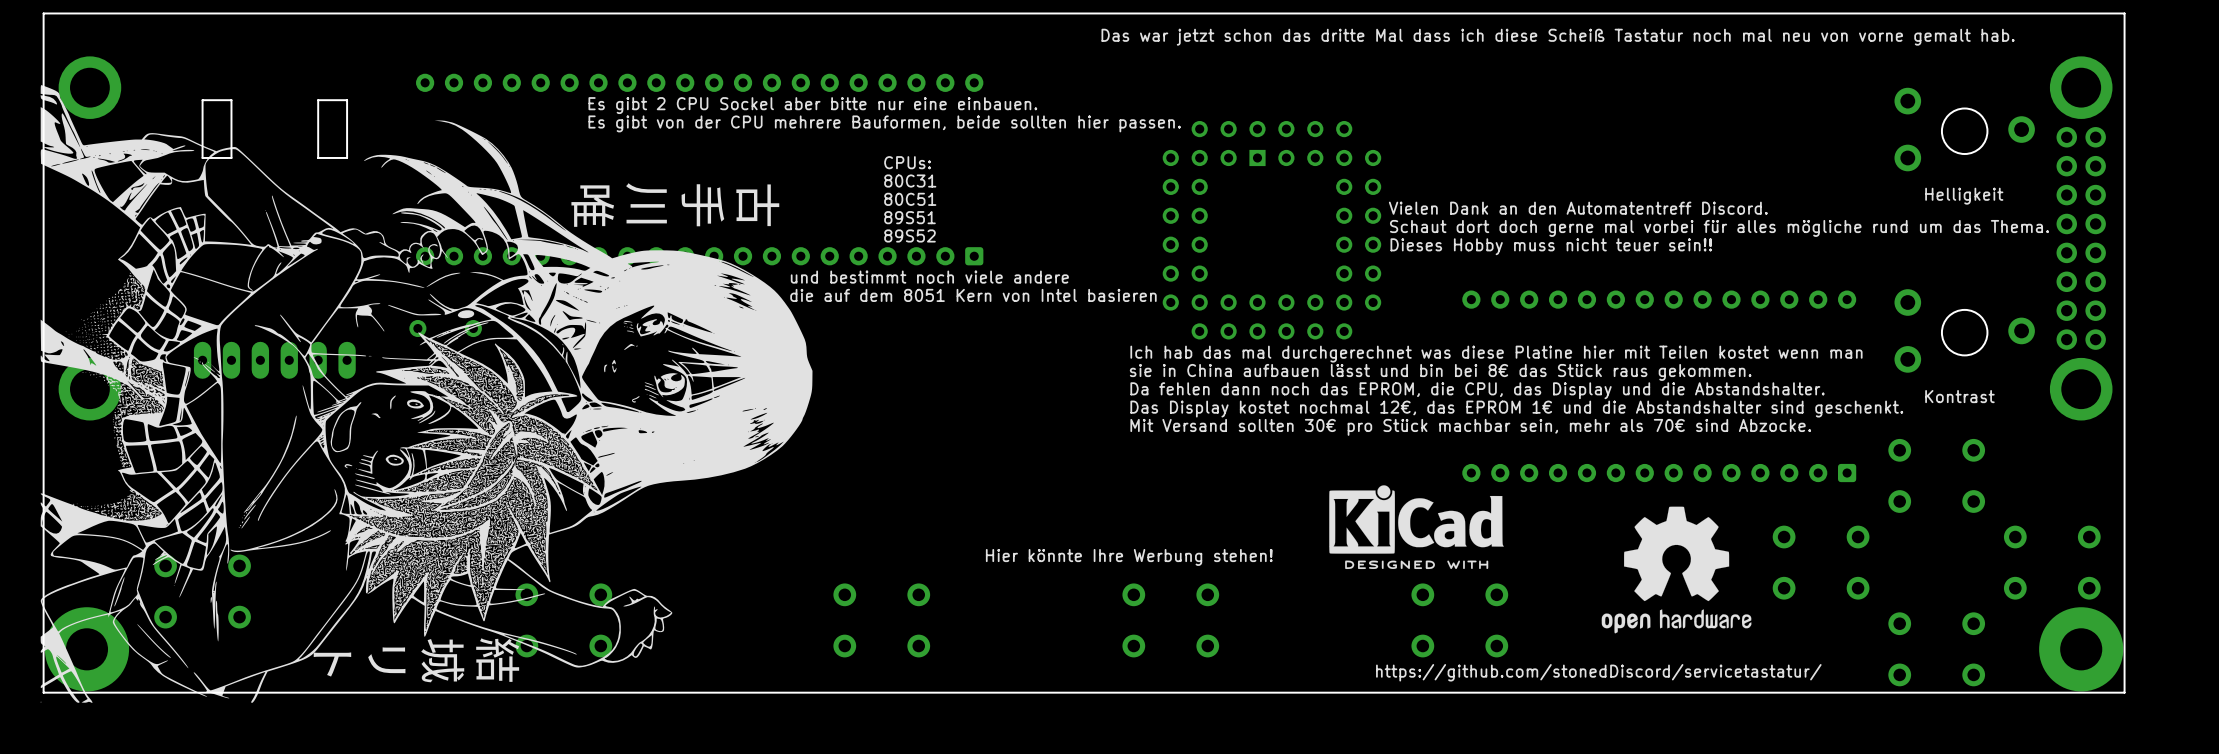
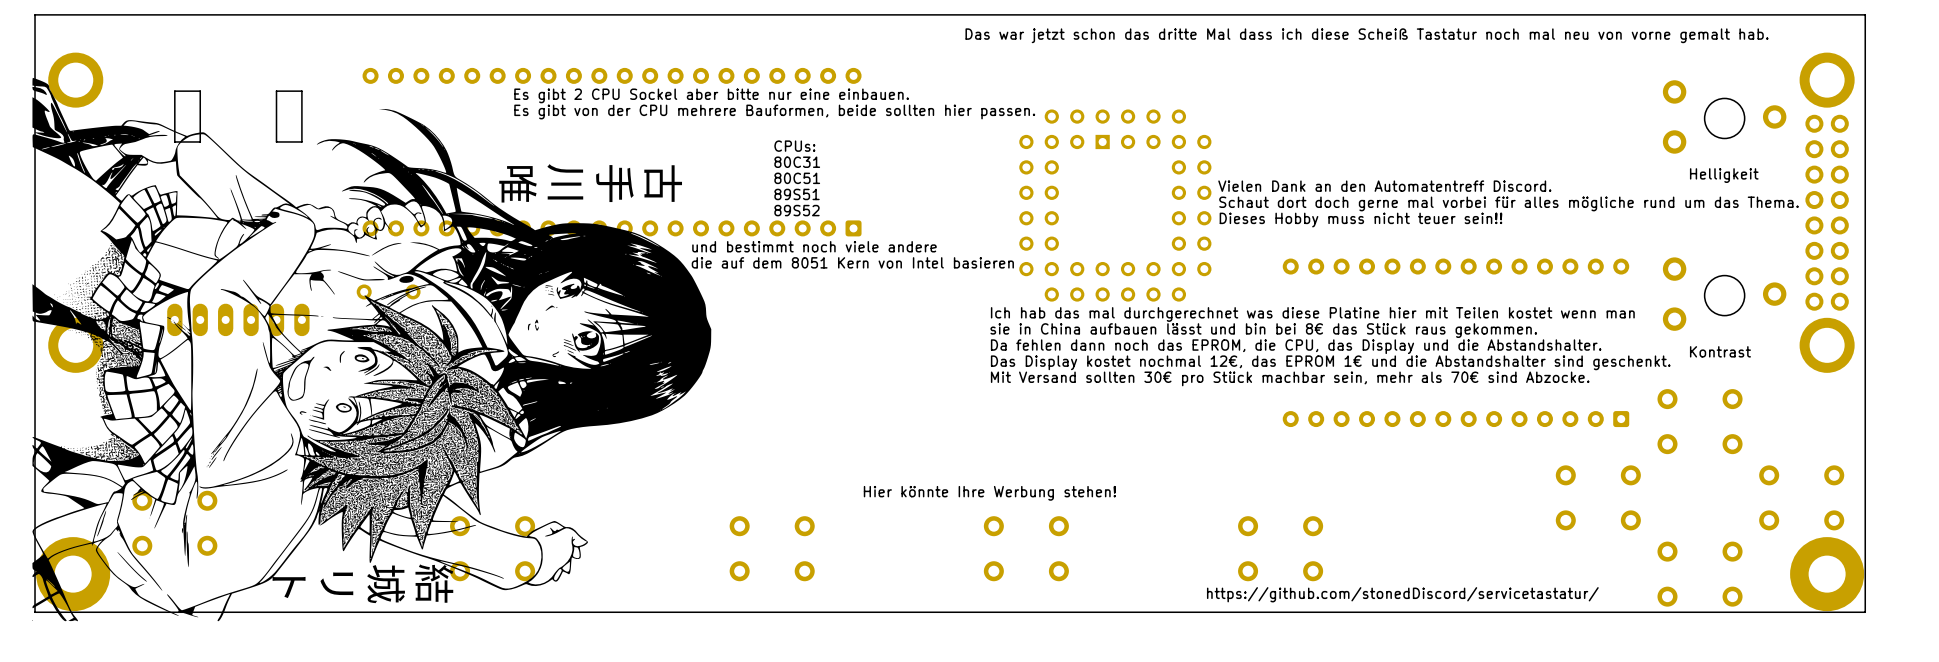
drawing: [1329, 485, 1504, 570] -> none
drawing: [1601, 506, 1752, 634] -> none

